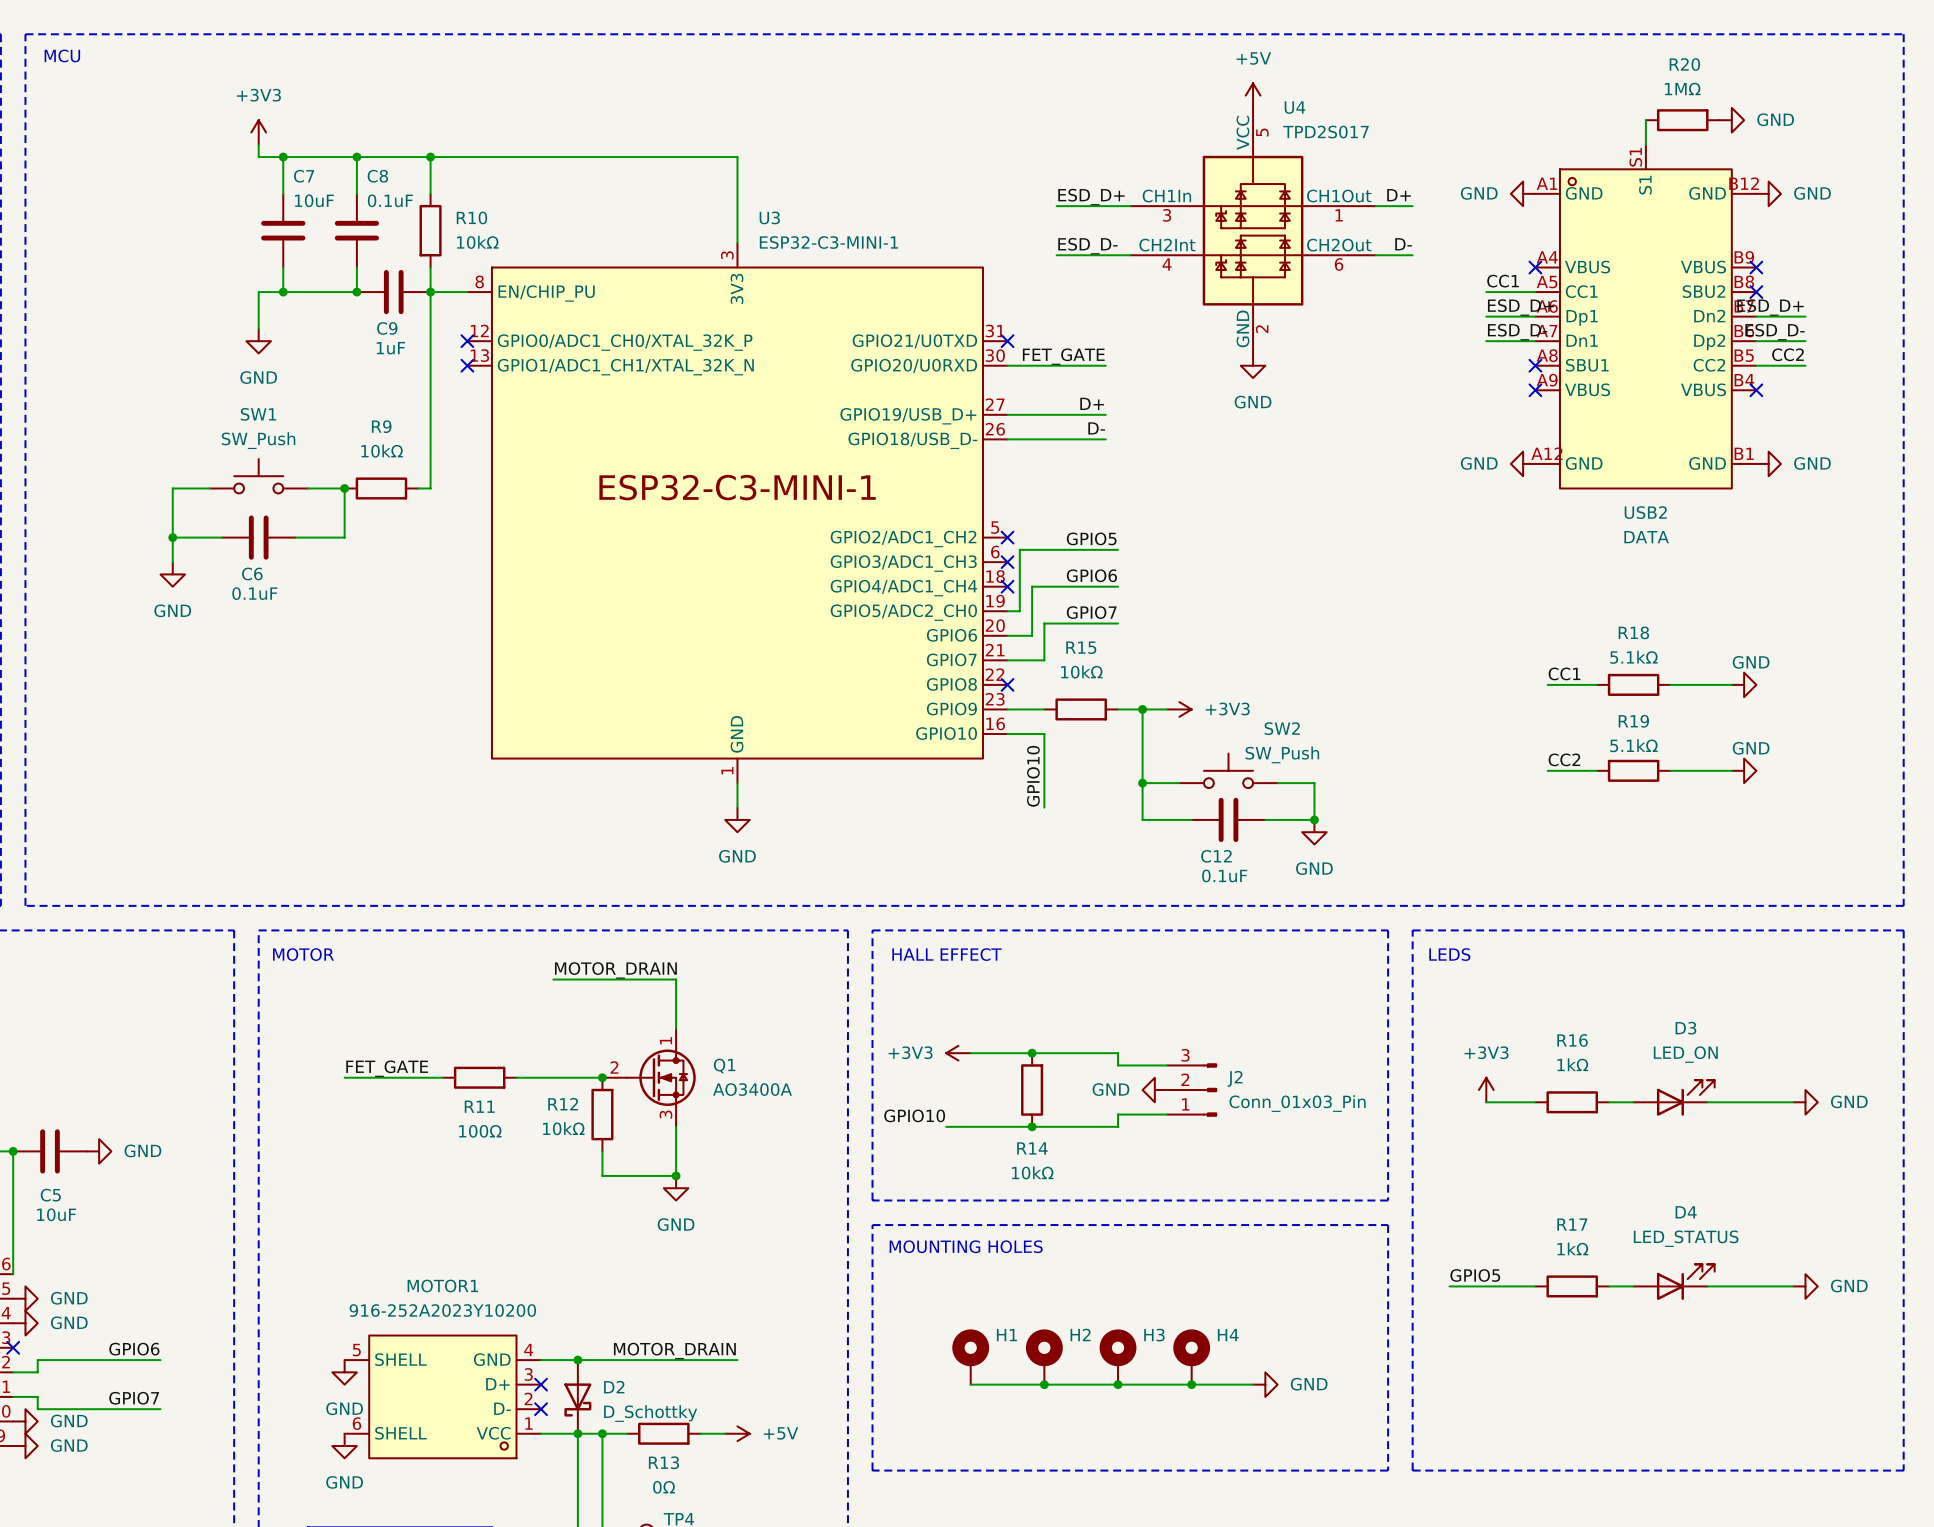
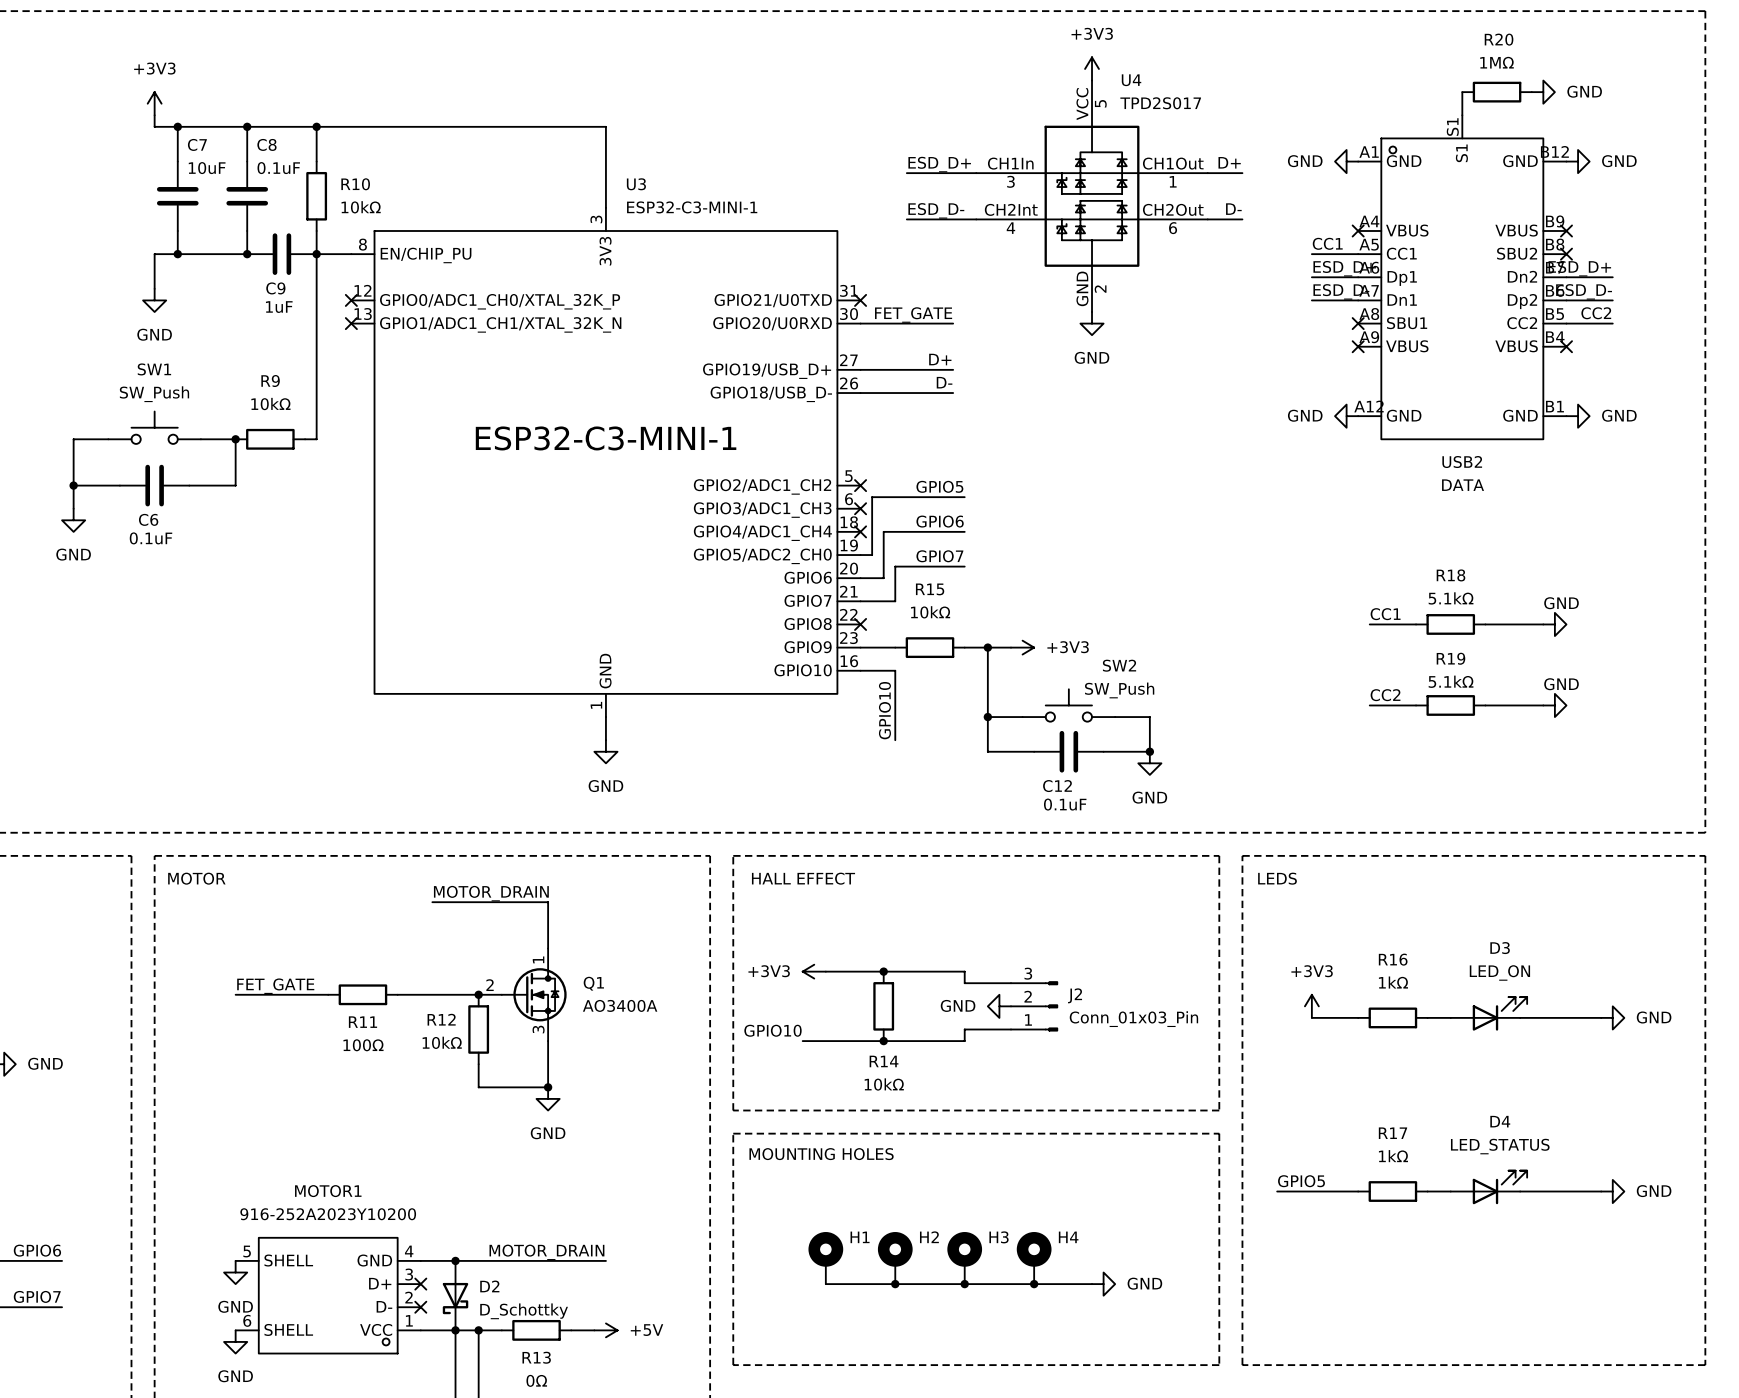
power symbol: +5V (1253, 95) -> +3V3 (1092, 68)

